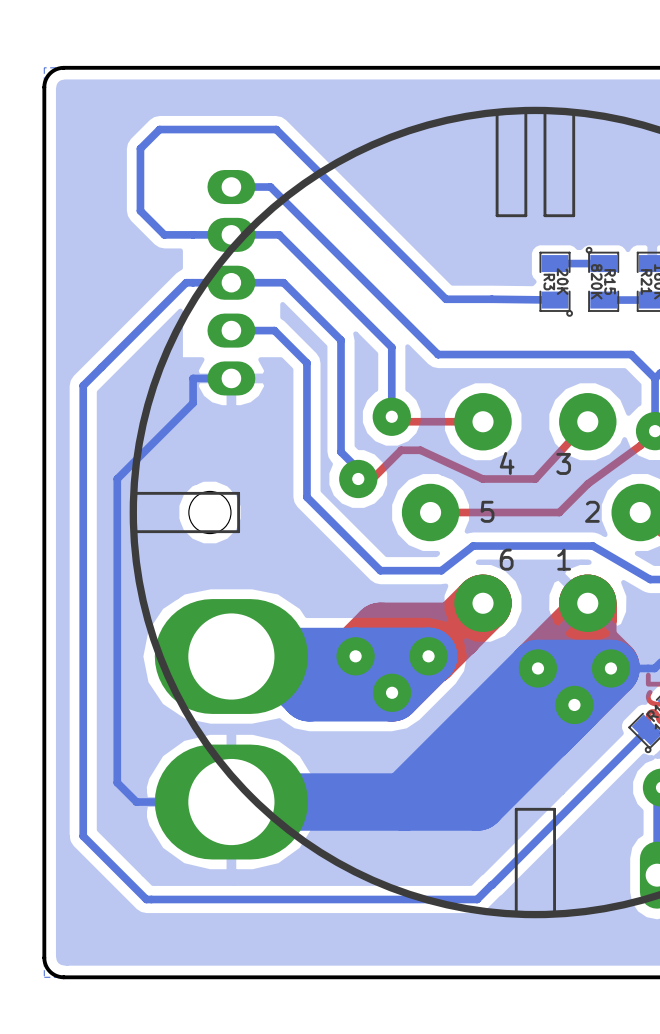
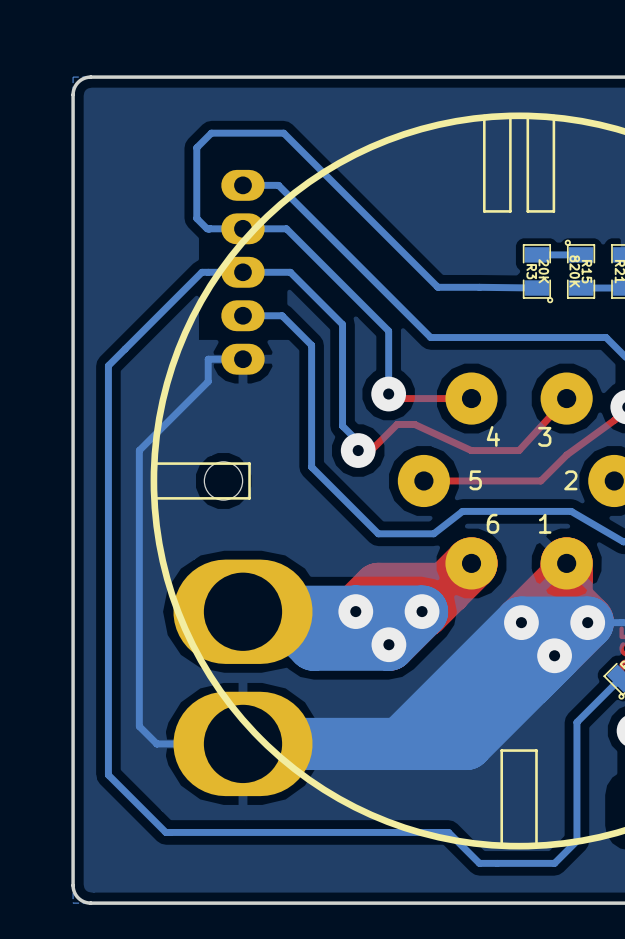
bottom track: (196, 129) (159, 129) (140, 148) (140, 210) (164, 234) (191, 234) -> (211, 133) (196, 147) (196, 218) (207, 228)
bottom track: (599, 778) (477, 899) (457, 899) -> (576, 722) (576, 841) (554, 863) (479, 863) (448, 832)

